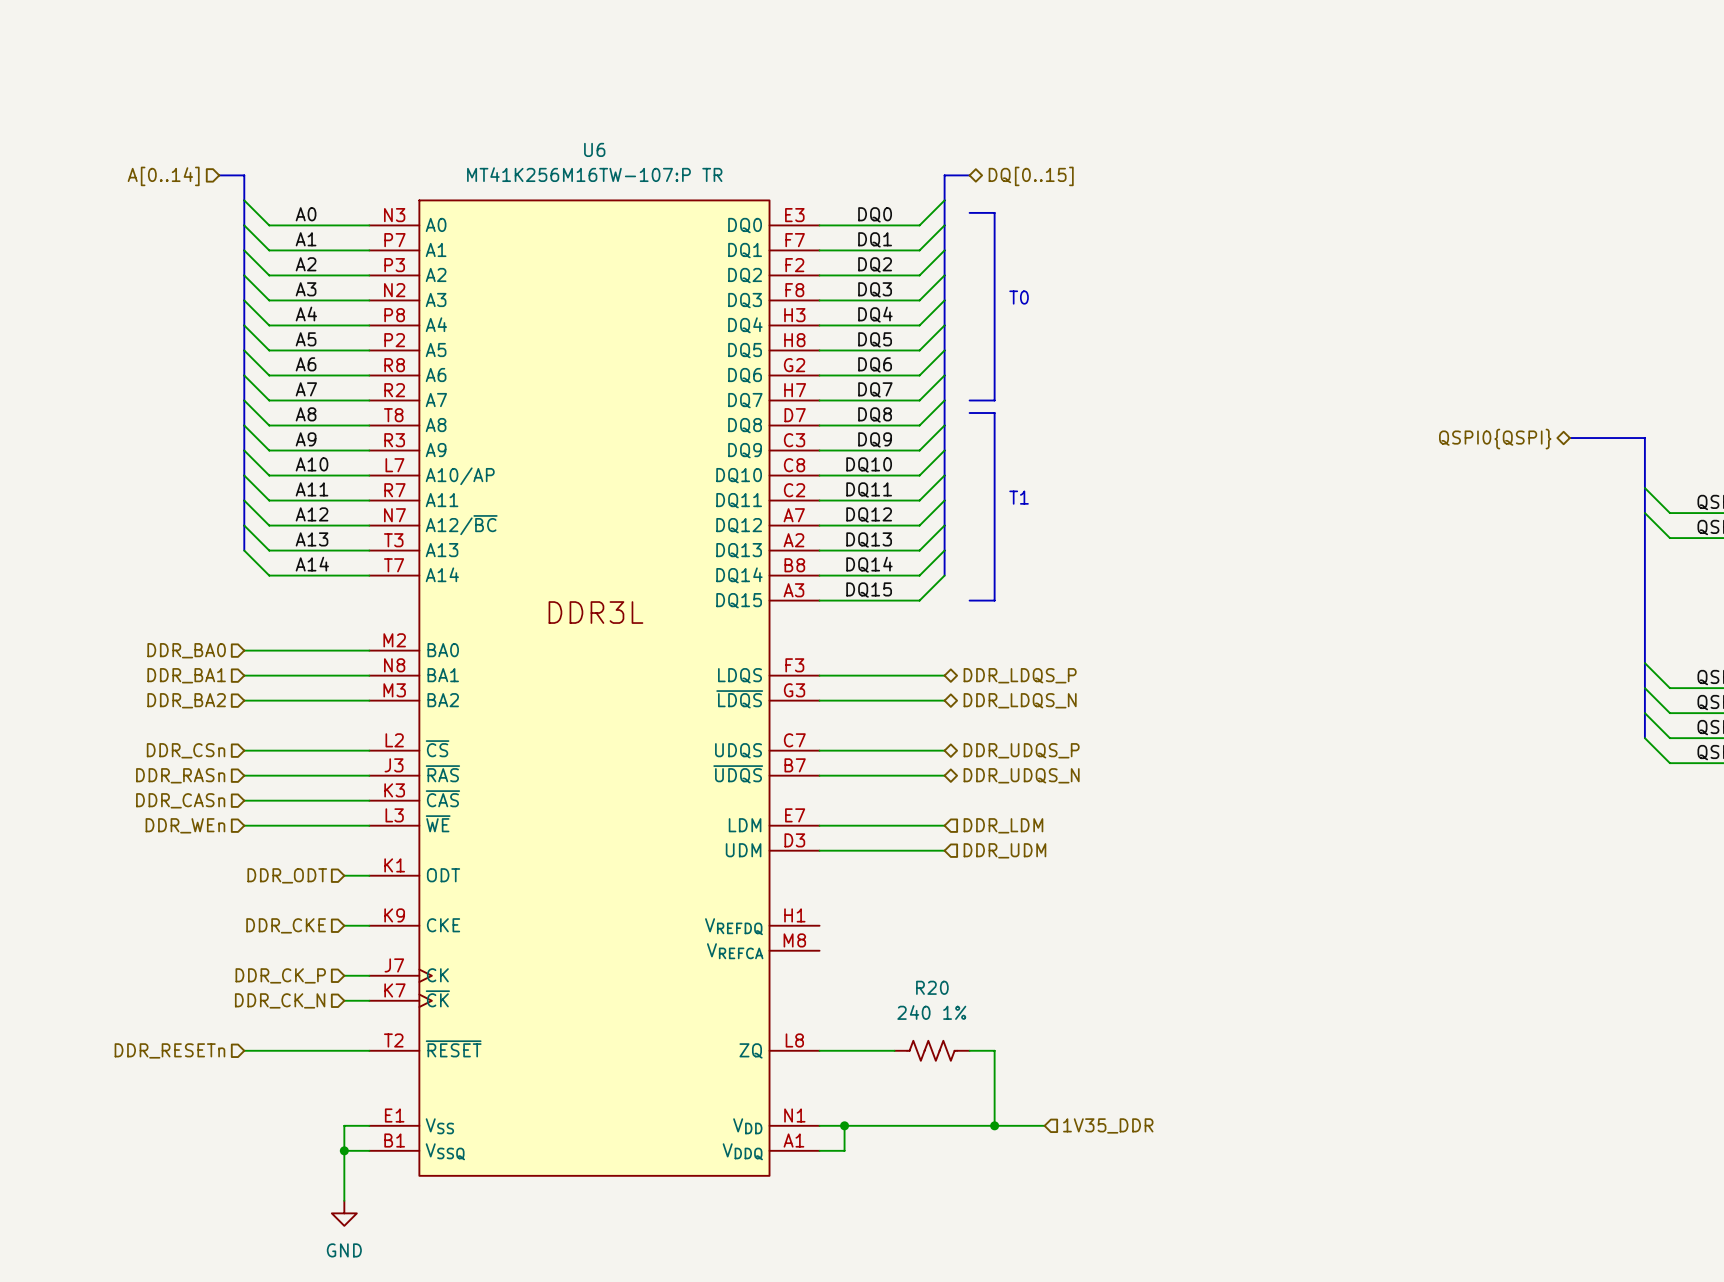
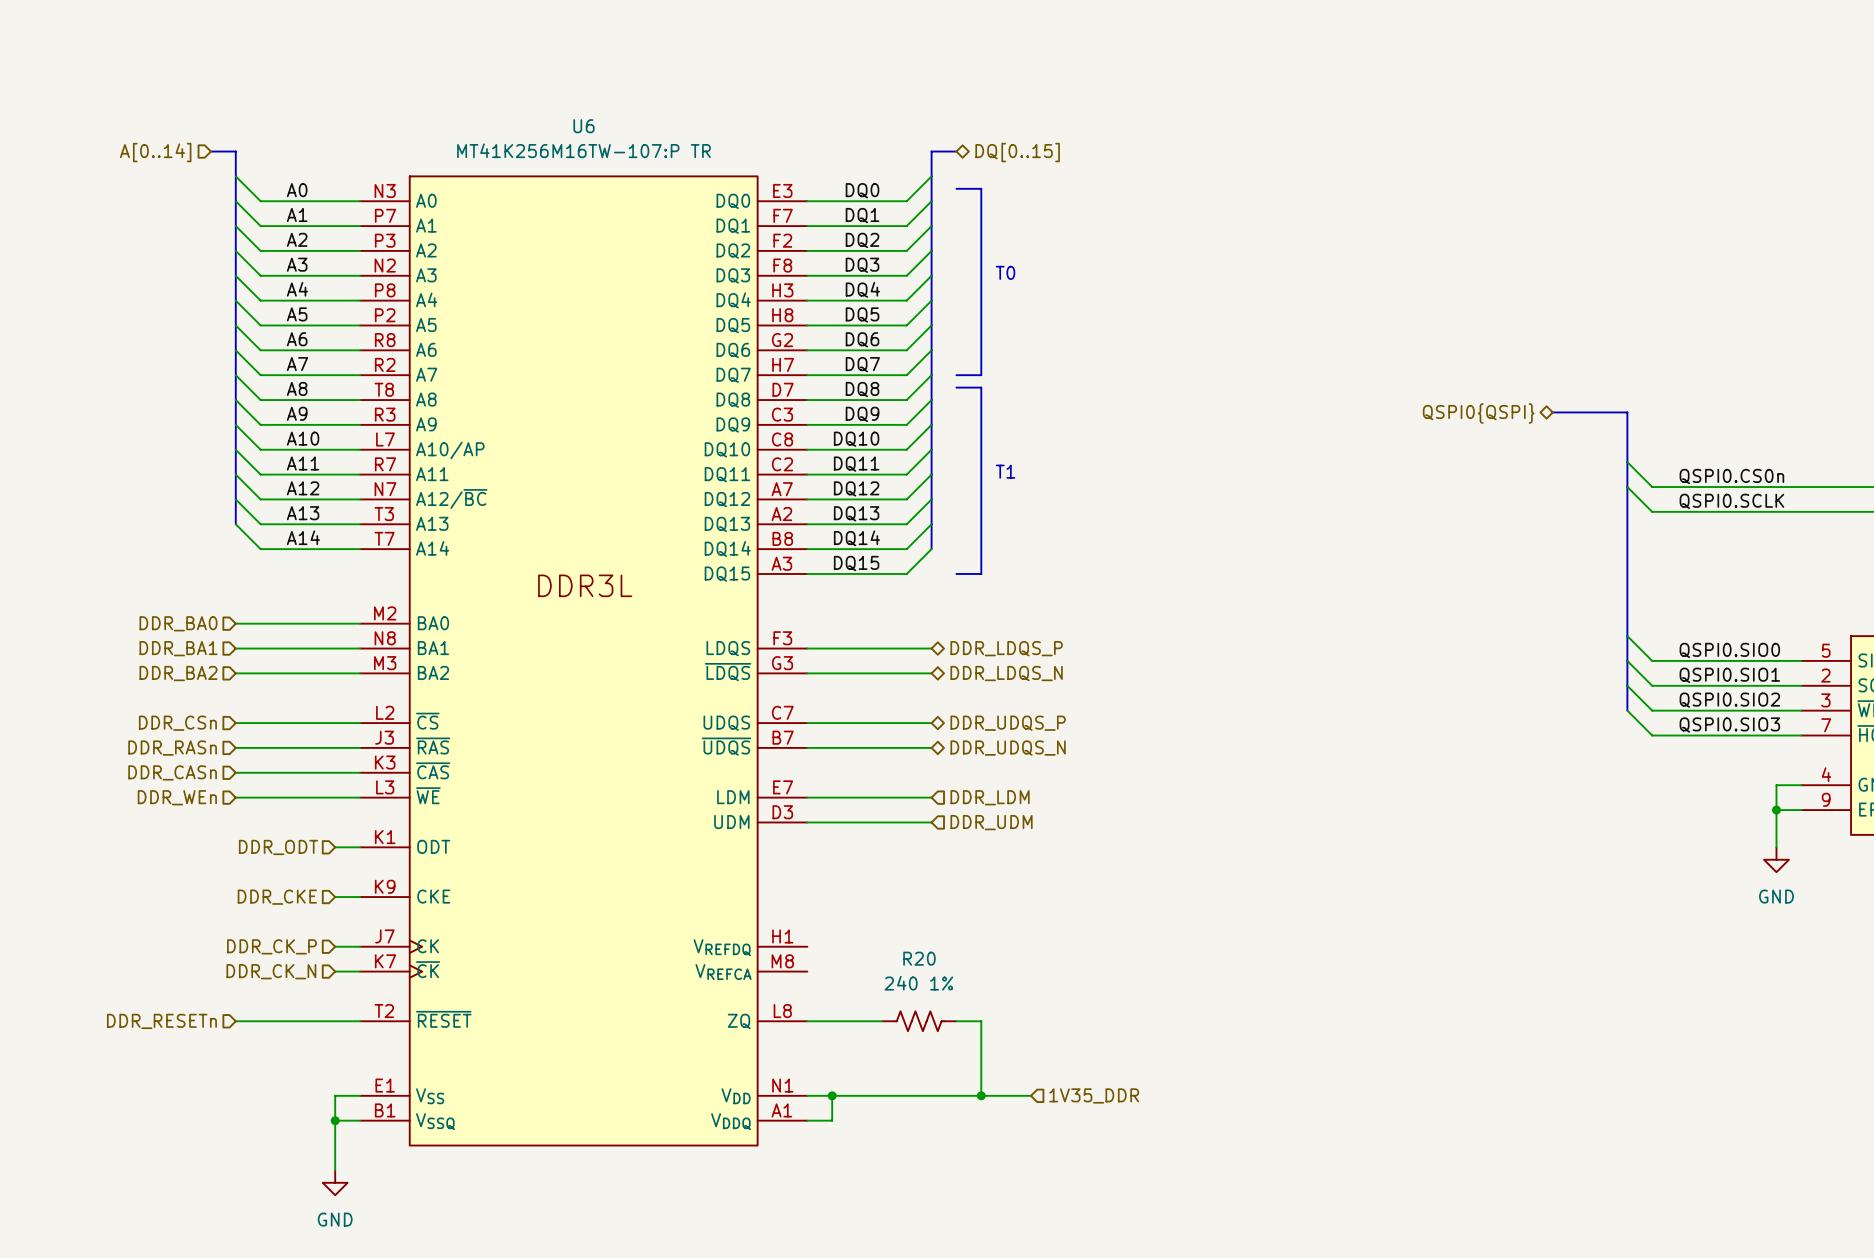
U6 symbol: [369, 200, 820, 1176] -> [360, 176, 808, 1146]

